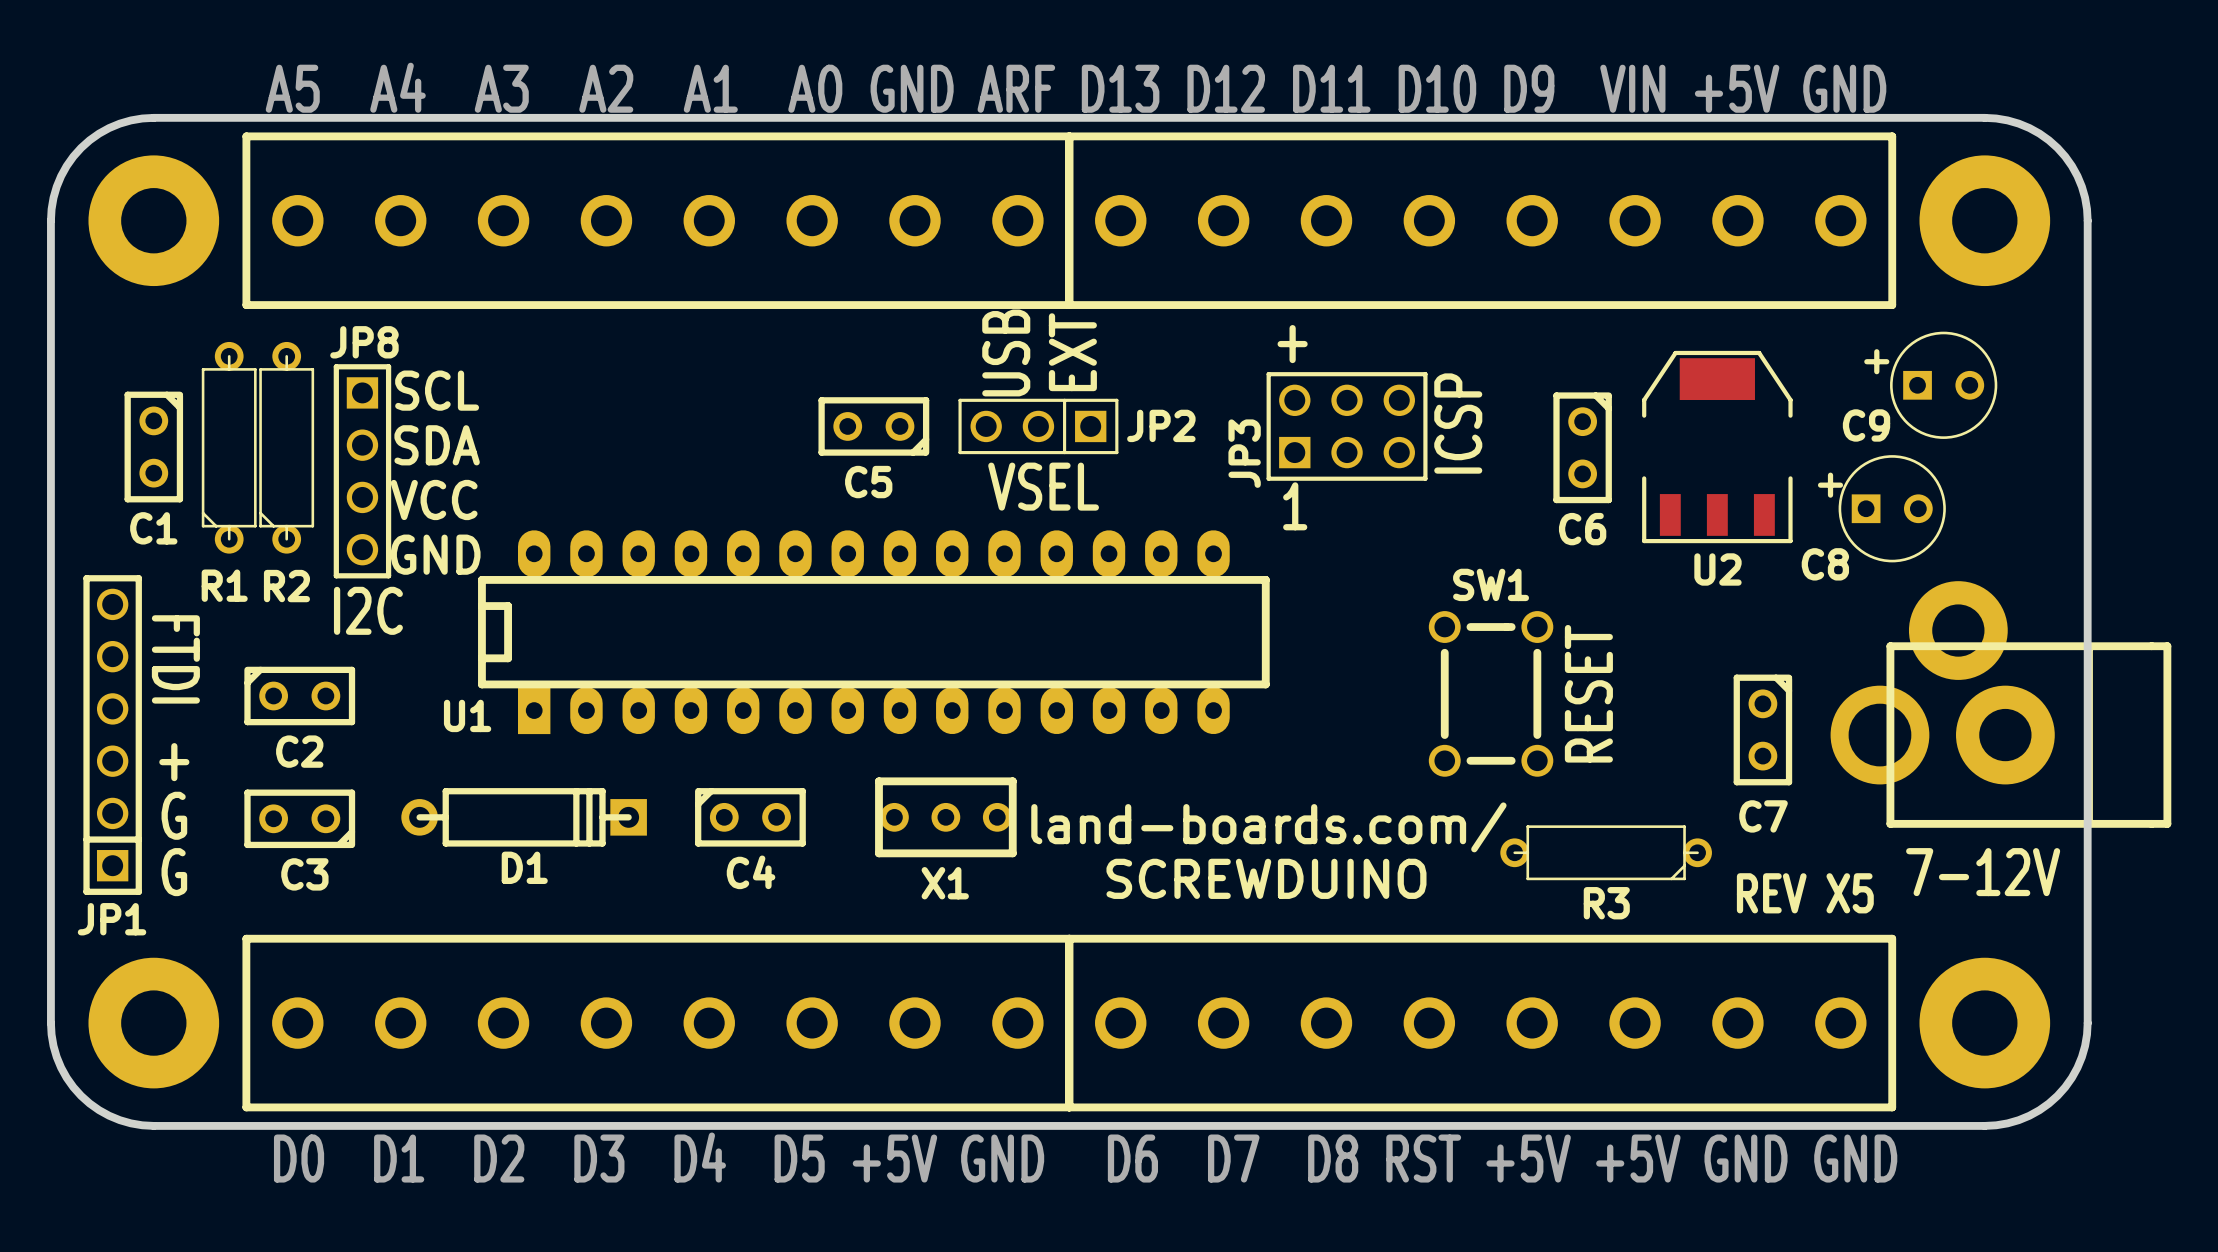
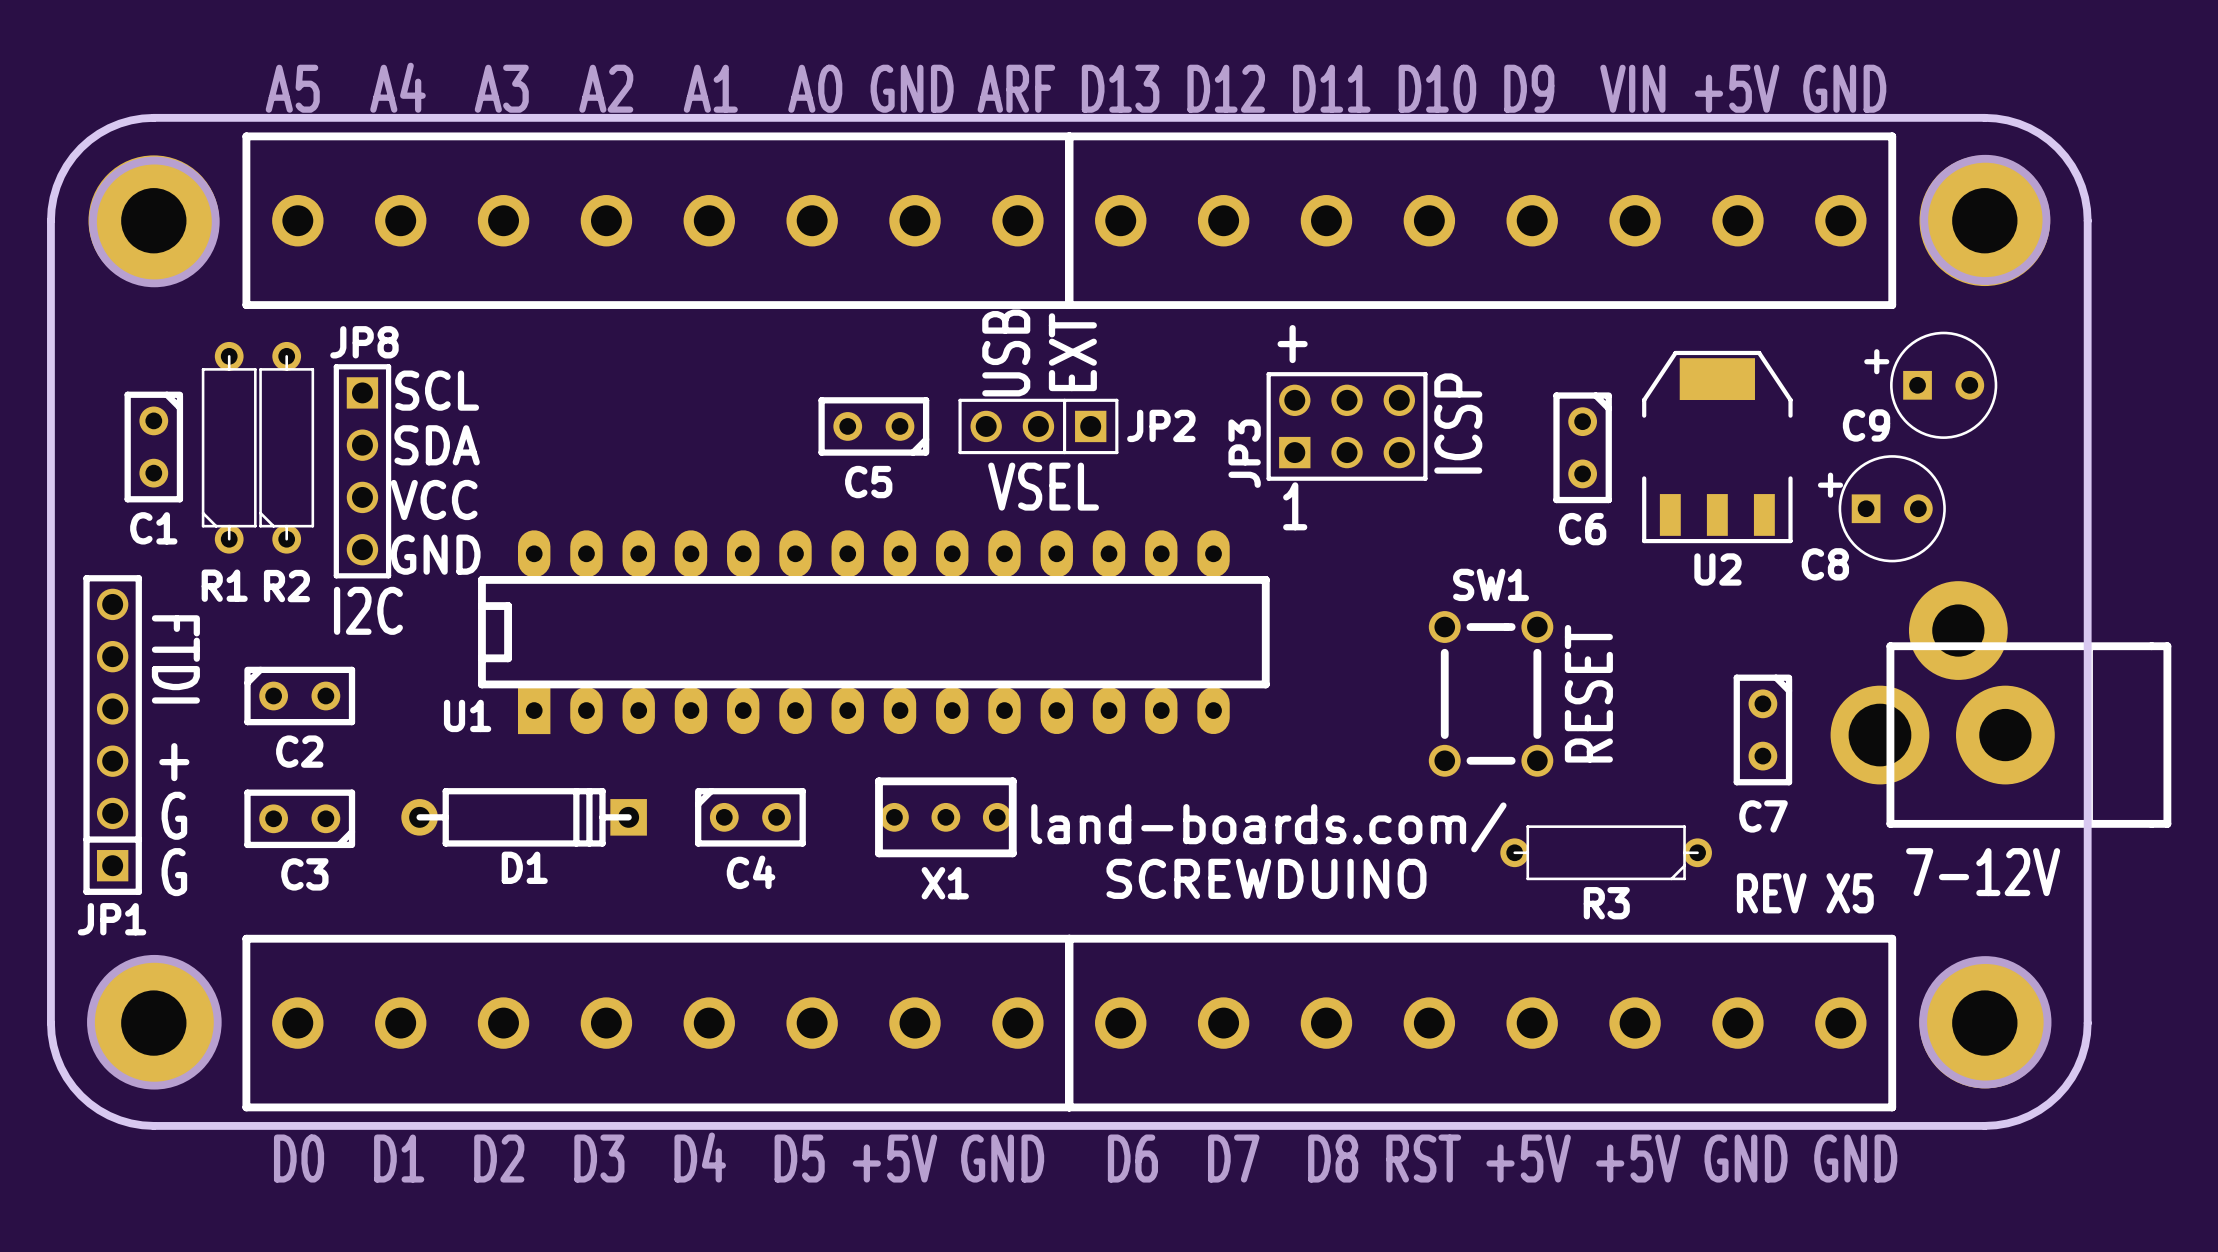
drawing: none -> [1920, 154, 2051, 285]
drawing: none -> [89, 156, 220, 288]
drawing: none -> [87, 954, 222, 1090]
drawing: none -> [1919, 956, 2052, 1089]

